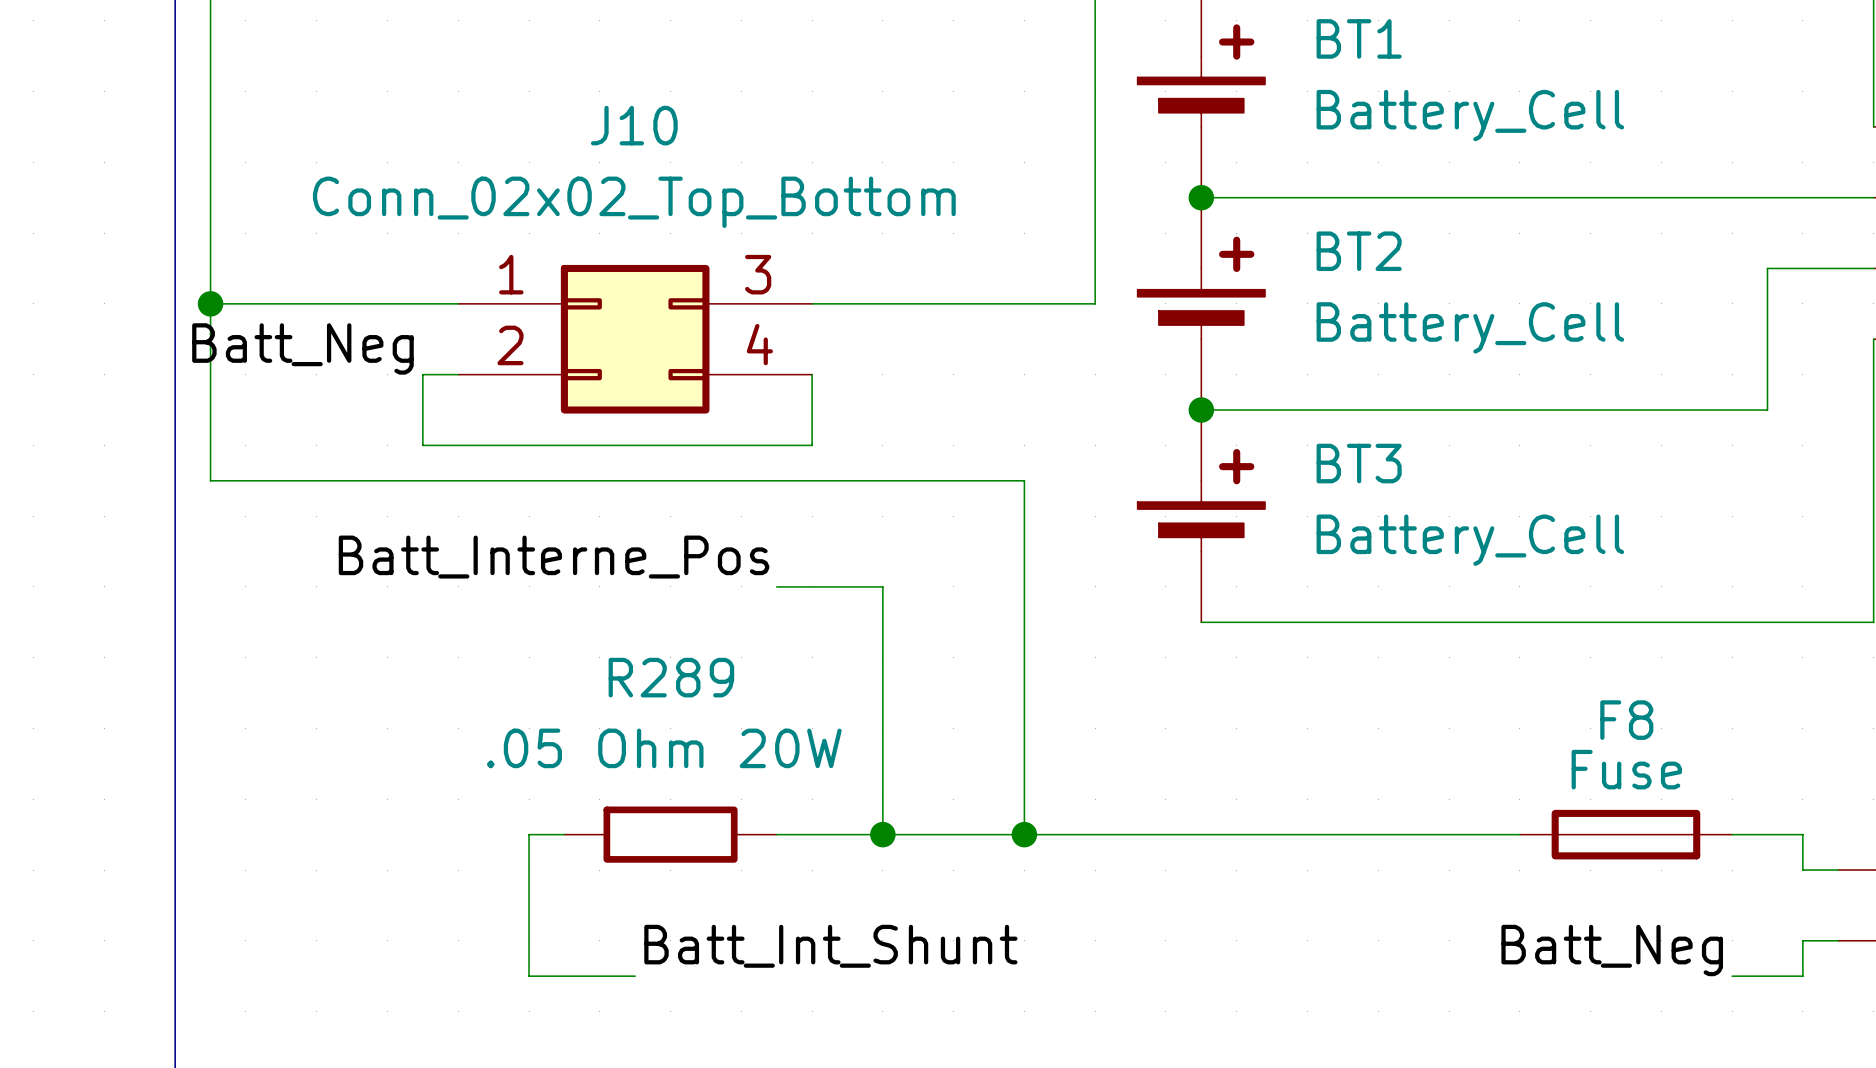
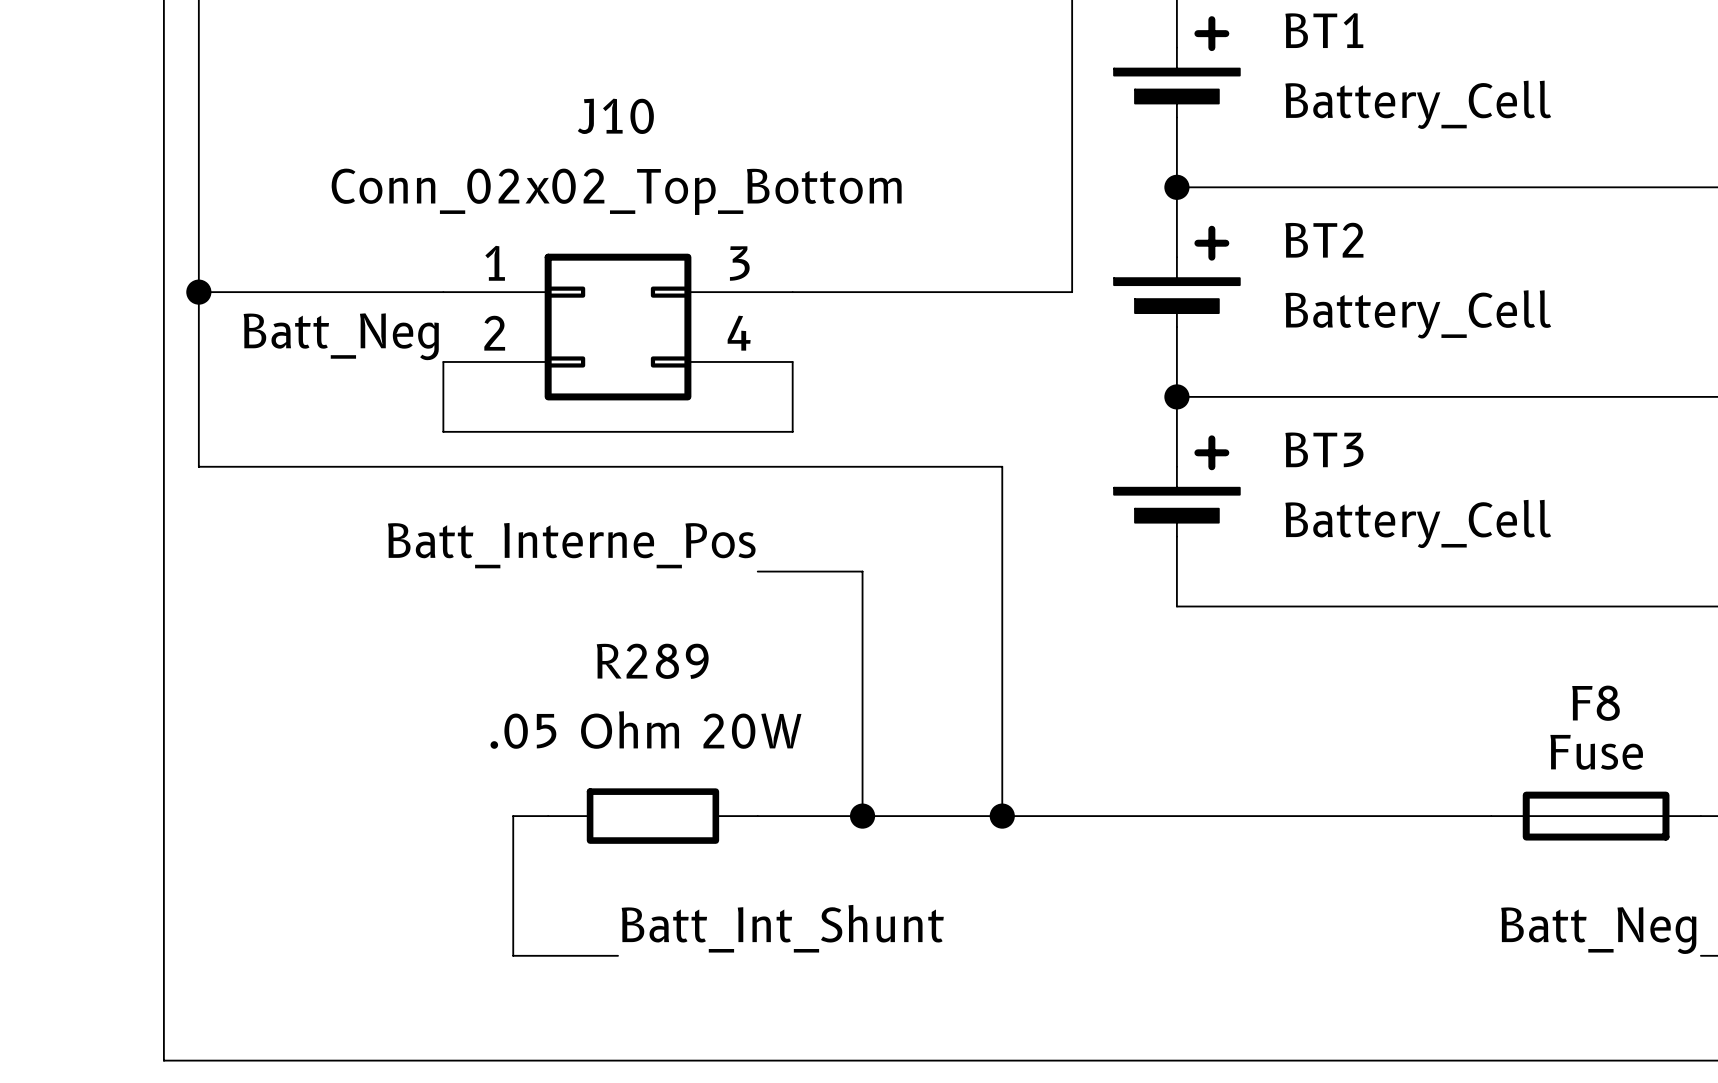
label position: Batt_Neg (302, 348) -> Batt_Neg (341, 336)
wire: (458, 374) (422, 374) (422, 445) (458, 445) -> (443, 361) (443, 431)

